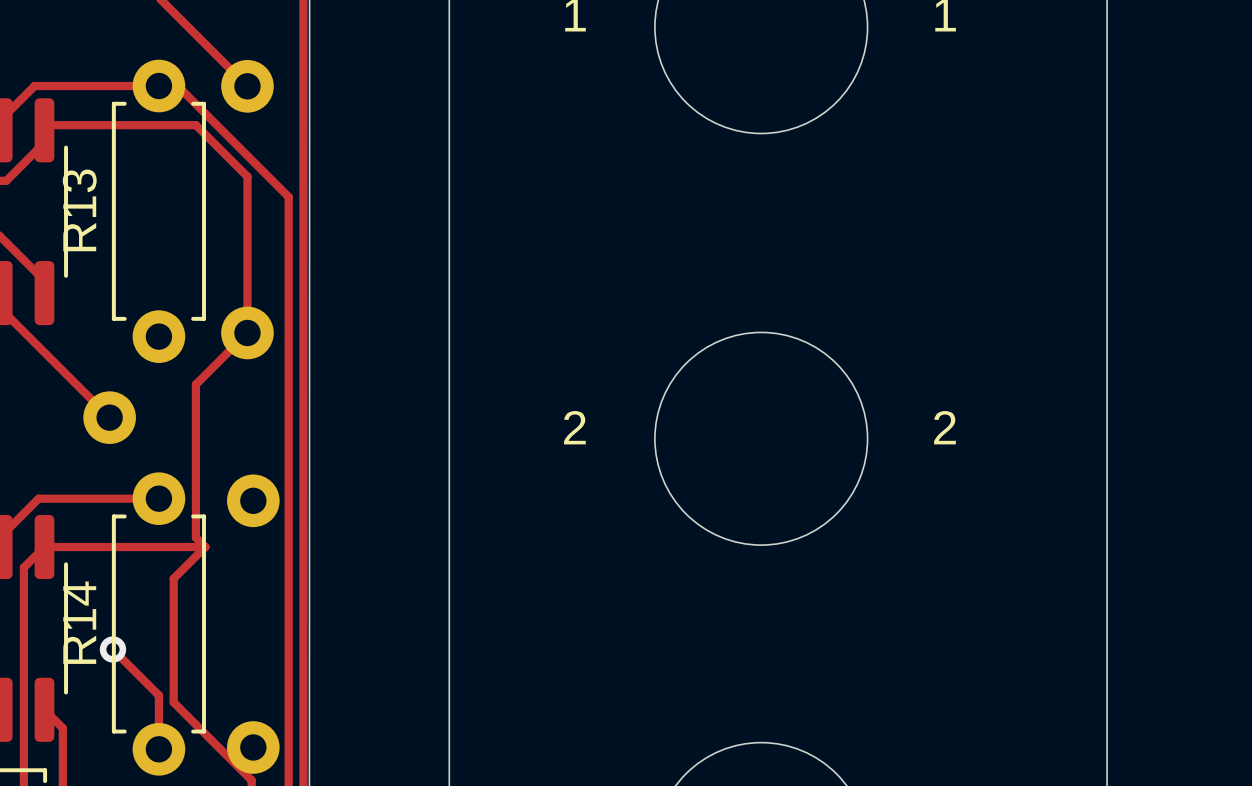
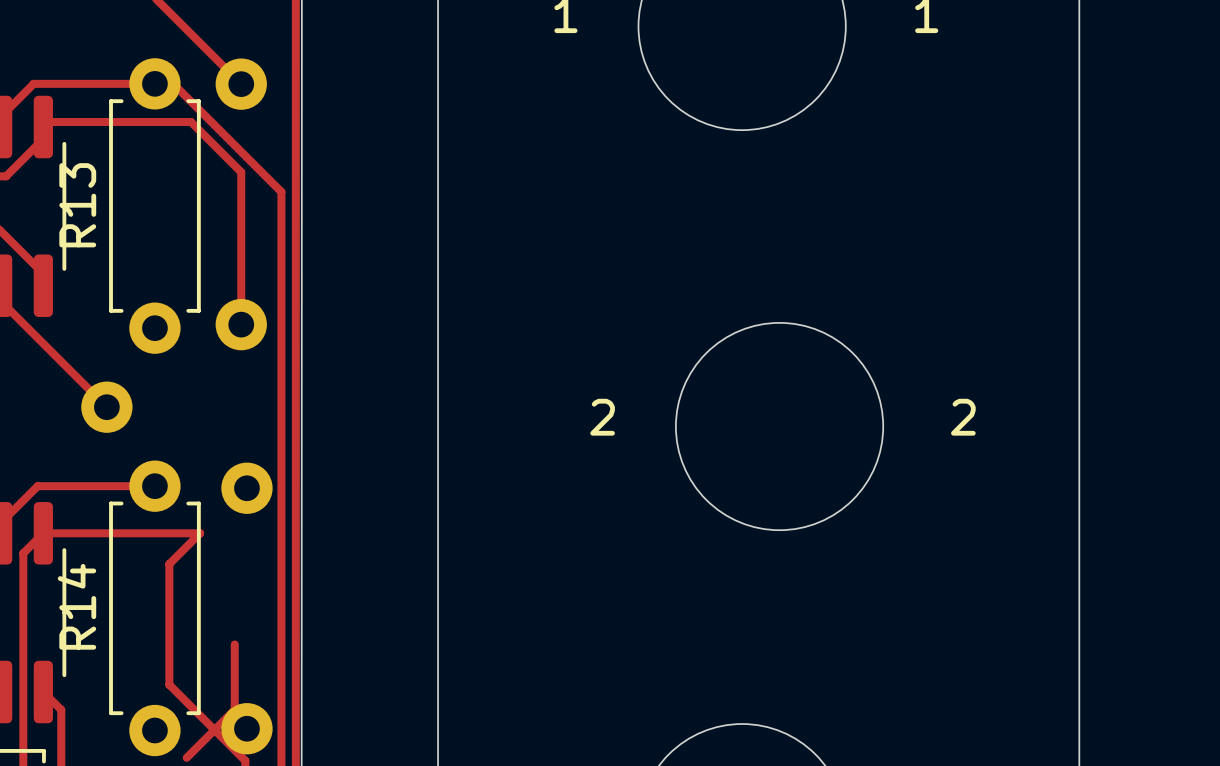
track: (247, 332) (195, 384) (195, 537) (205, 547) -> none
text position: 2 (574, 427) -> 2 (602, 417)
text position: 2 (944, 427) -> 2 (963, 417)
round board edge position: (761, 438) -> (779, 426)
track: (112, 649) (158, 695) (158, 749) -> none
via: (112, 649) -> none
track: none -> (234, 644) (234, 709) (186, 757)

